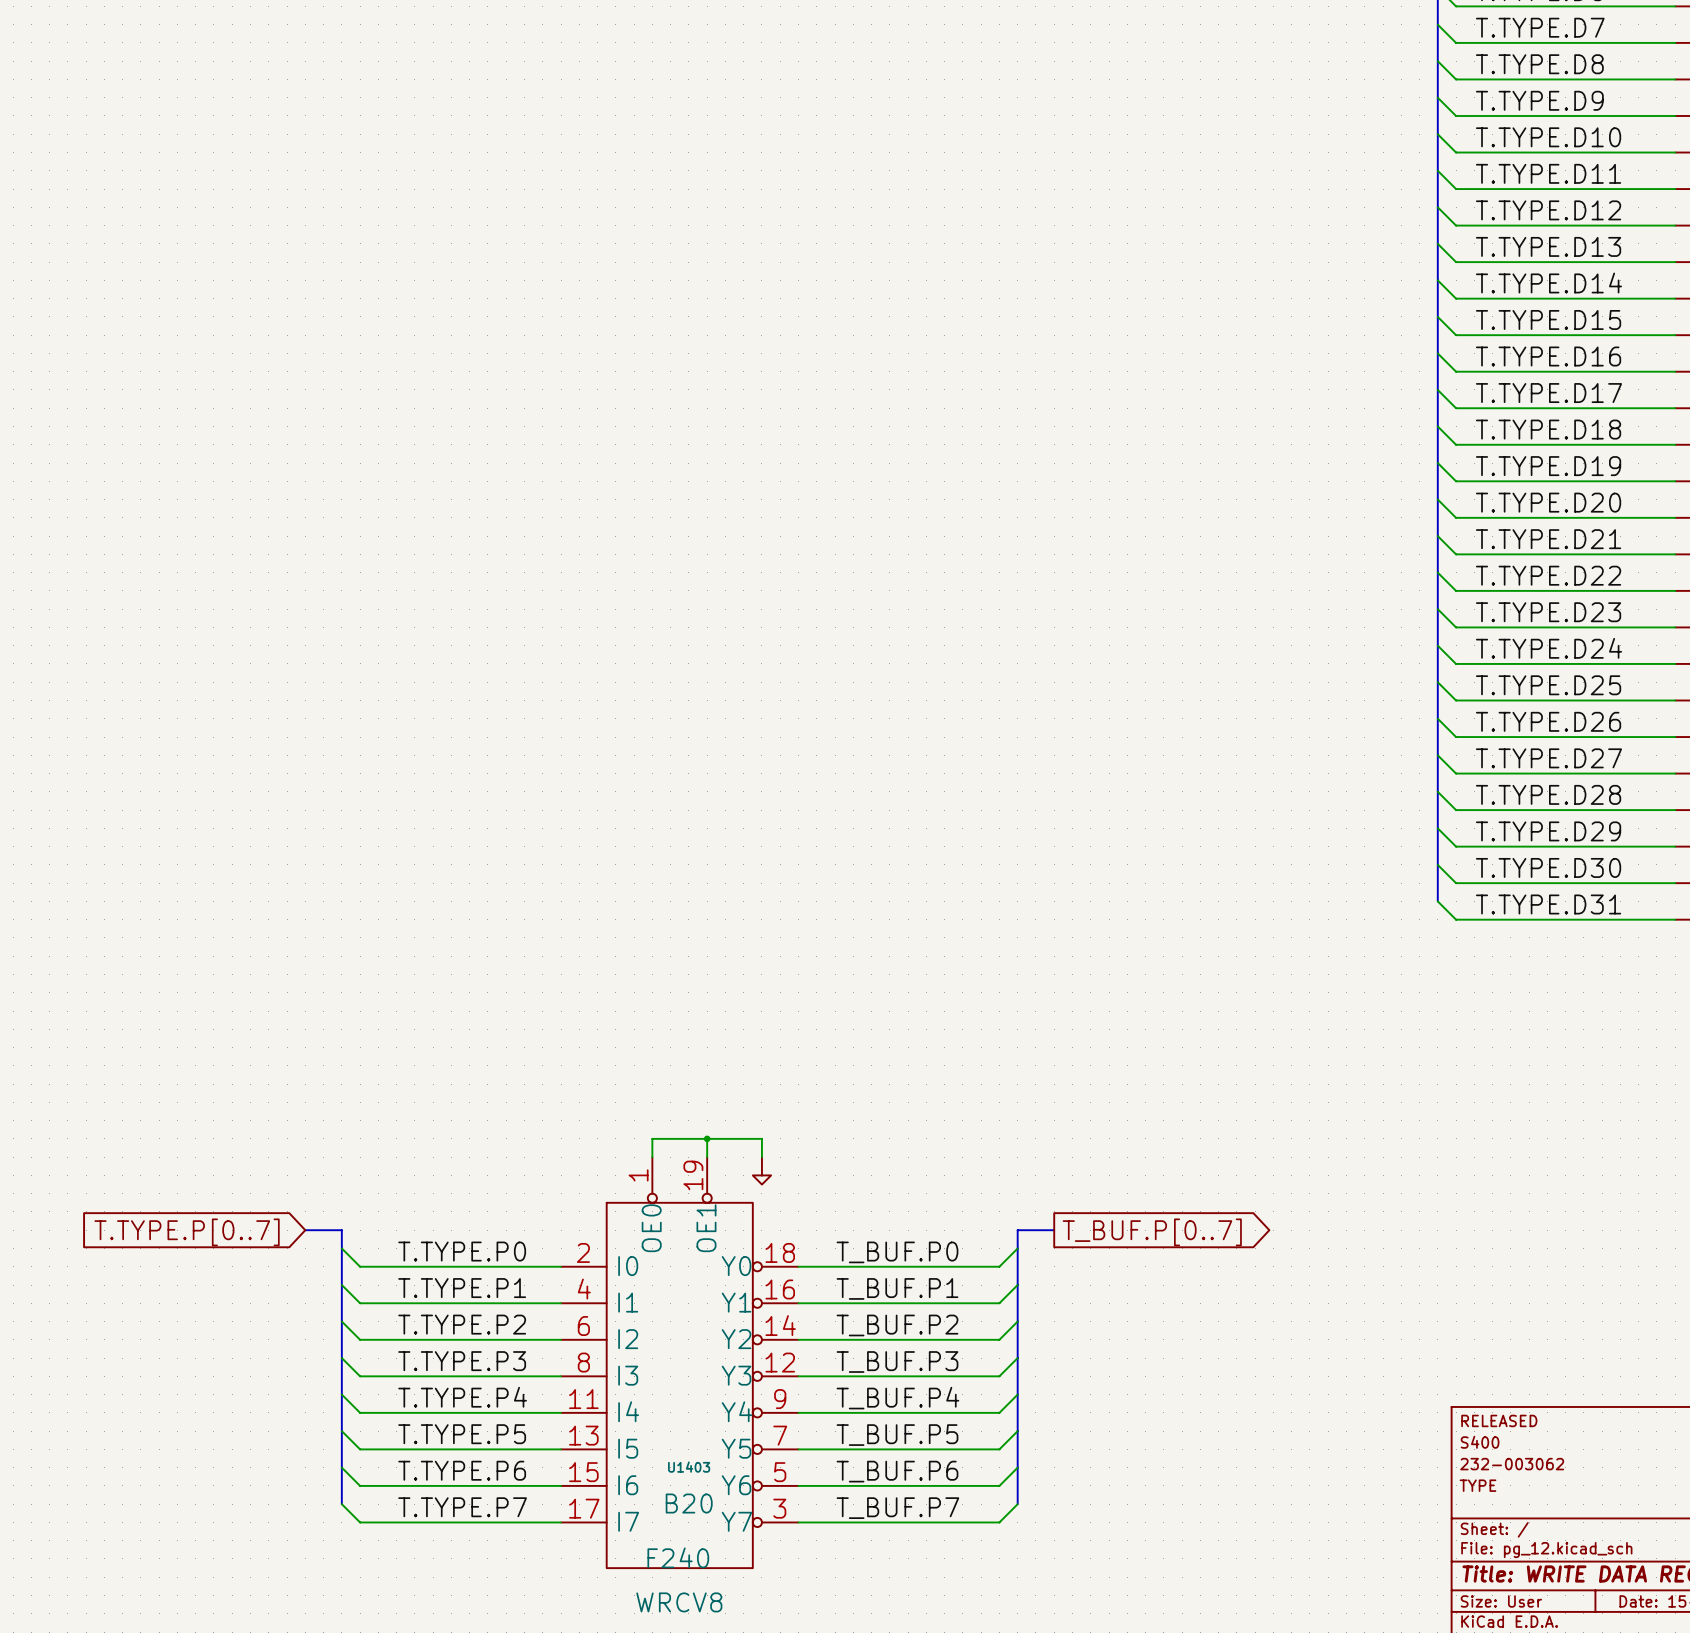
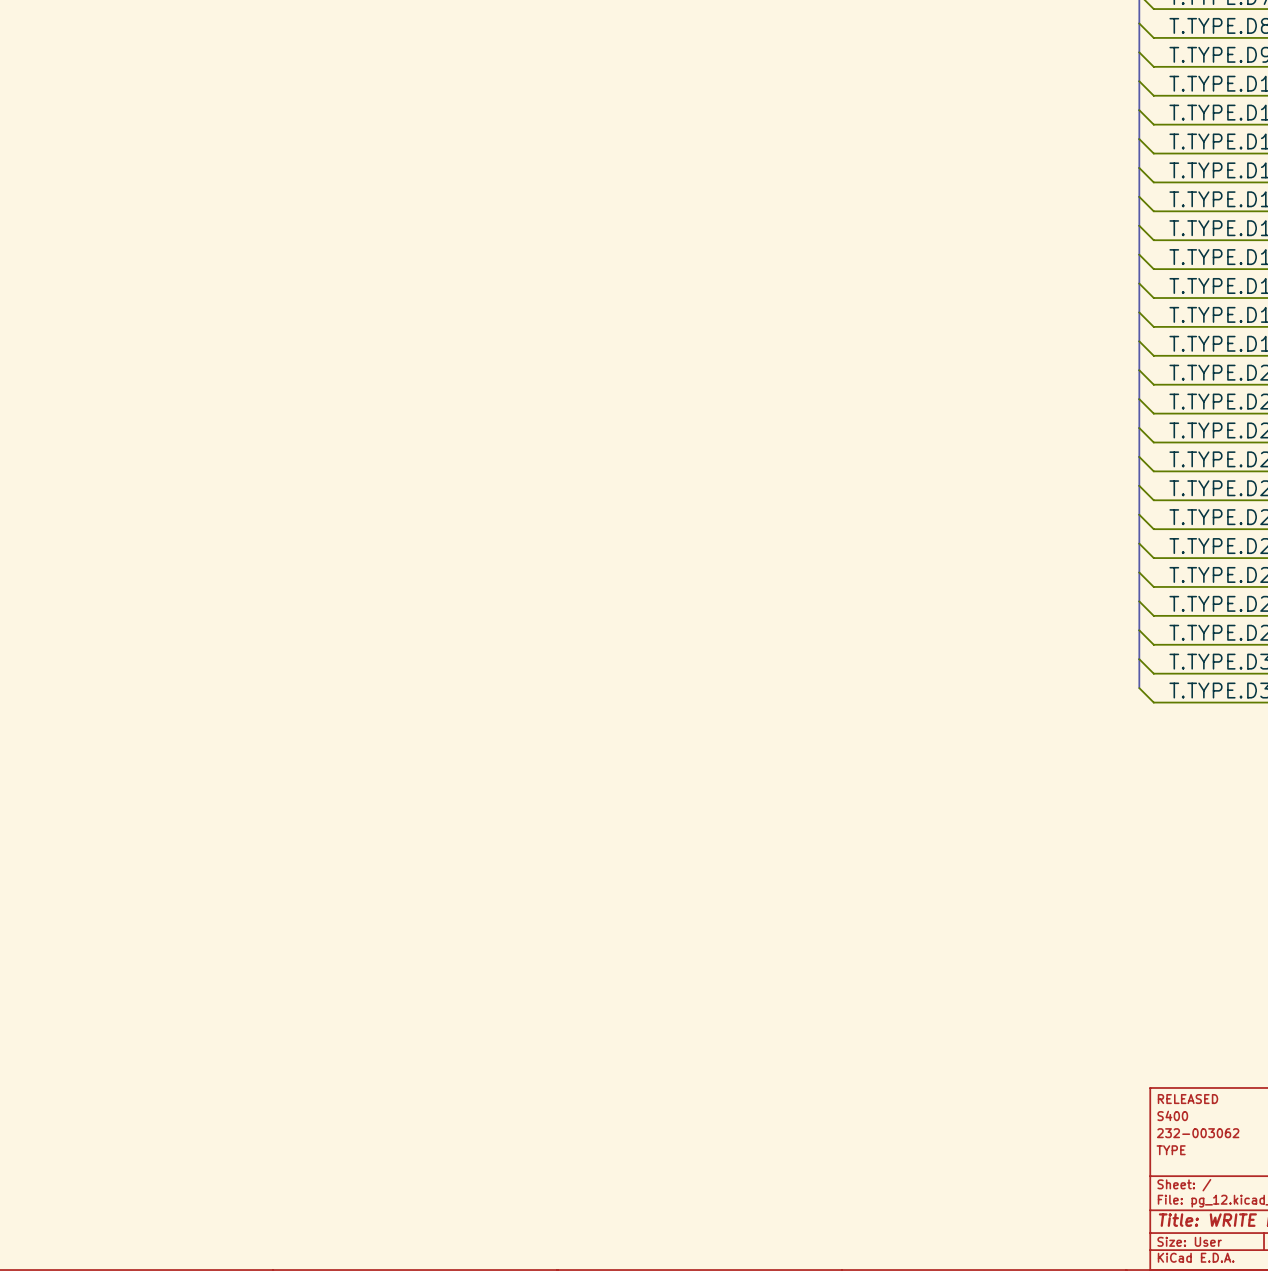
wire: (707, 1138) (707, 1157) -> none
junction: (707, 1138) -> none
wire: (652, 1157) (652, 1138) (761, 1138) (761, 1157) -> none
power symbol: (761, 1171) -> none
bus: (305, 1230) (341, 1230) (341, 1504) -> none
bus: (1054, 1230) (1017, 1230) (1017, 1504) -> none
global label: T.TYPE.P[0..7] (187, 1232) -> none
global label: T_BUF.P[0..7] (1152, 1232) -> none
wire: (341, 1248) (360, 1266) (561, 1266) -> none
wire: (1017, 1248) (999, 1266) (798, 1266) -> none
label: T.TYPE.P0 (462, 1251) -> none
label: T_BUF.P0 (897, 1252) -> none
wire: (341, 1285) (360, 1303) (561, 1303) -> none
wire: (1017, 1285) (999, 1303) (798, 1303) -> none
label: T.TYPE.P1 (462, 1288) -> none
label: T_BUF.P1 (897, 1288) -> none
wire: (341, 1321) (360, 1339) (561, 1339) -> none
wire: (1017, 1321) (999, 1339) (798, 1339) -> none
label: T.TYPE.P2 (462, 1324) -> none
label: T_BUF.P2 (897, 1325) -> none
wire: (341, 1358) (360, 1376) (561, 1376) -> none
wire: (1017, 1358) (999, 1376) (798, 1376) -> none
label: T.TYPE.P3 (462, 1361) -> none
U1403: F240 (679, 1362) -> none
label: T_BUF.P3 (897, 1362) -> none
wire: (341, 1394) (360, 1412) (561, 1412) -> none
wire: (1017, 1394) (999, 1412) (798, 1412) -> none
label: T.TYPE.P4 (462, 1397) -> none
label: T_BUF.P4 (897, 1398) -> none
wire: (341, 1431) (360, 1449) (561, 1449) -> none
wire: (1017, 1431) (999, 1449) (798, 1449) -> none
label: T.TYPE.P5 (462, 1434) -> none
label: T_BUF.P5 (897, 1435) -> none
wire: (341, 1467) (360, 1485) (561, 1485) -> none
wire: (1017, 1467) (999, 1485) (798, 1485) -> none
label: T.TYPE.P6 (462, 1470) -> none
label: T_BUF.P6 (897, 1471) -> none
wire: (341, 1504) (360, 1522) (561, 1522) -> none
wire: (1017, 1504) (999, 1522) (798, 1522) -> none
label: T.TYPE.P7 (462, 1507) -> none
label: T_BUF.P7 (897, 1508) -> none

